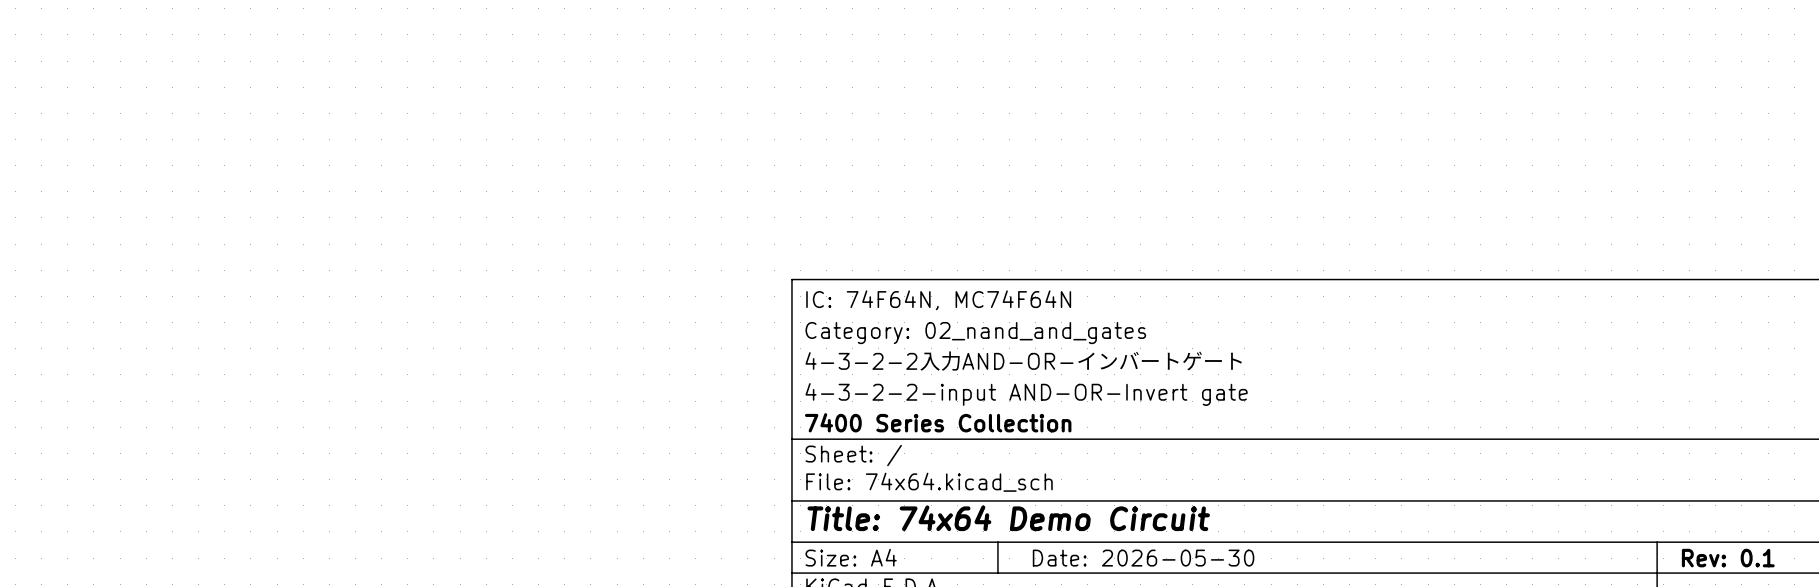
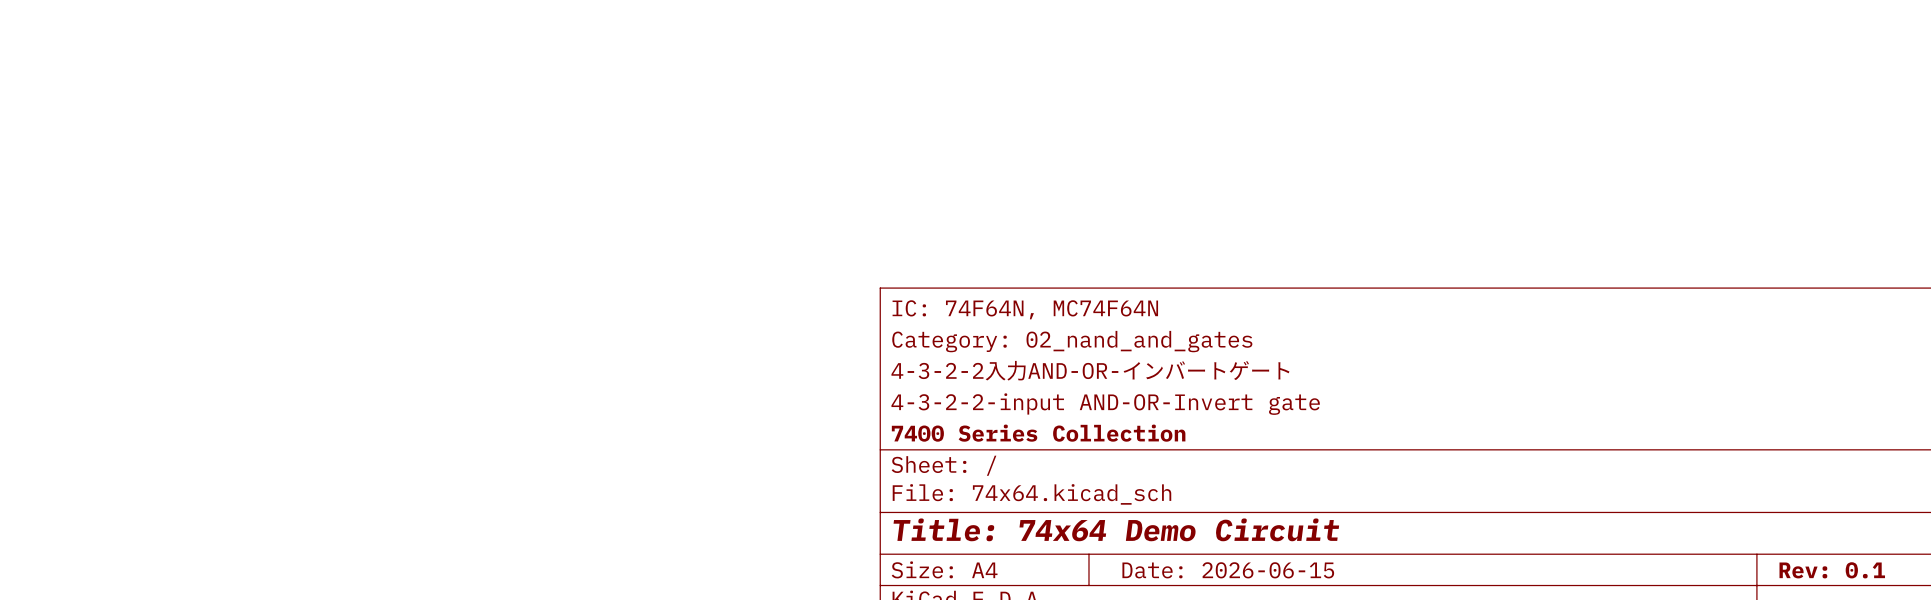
title block: Date: 2026-05-30 (1143, 558) -> Date: 2026-06-15 (1228, 570)

